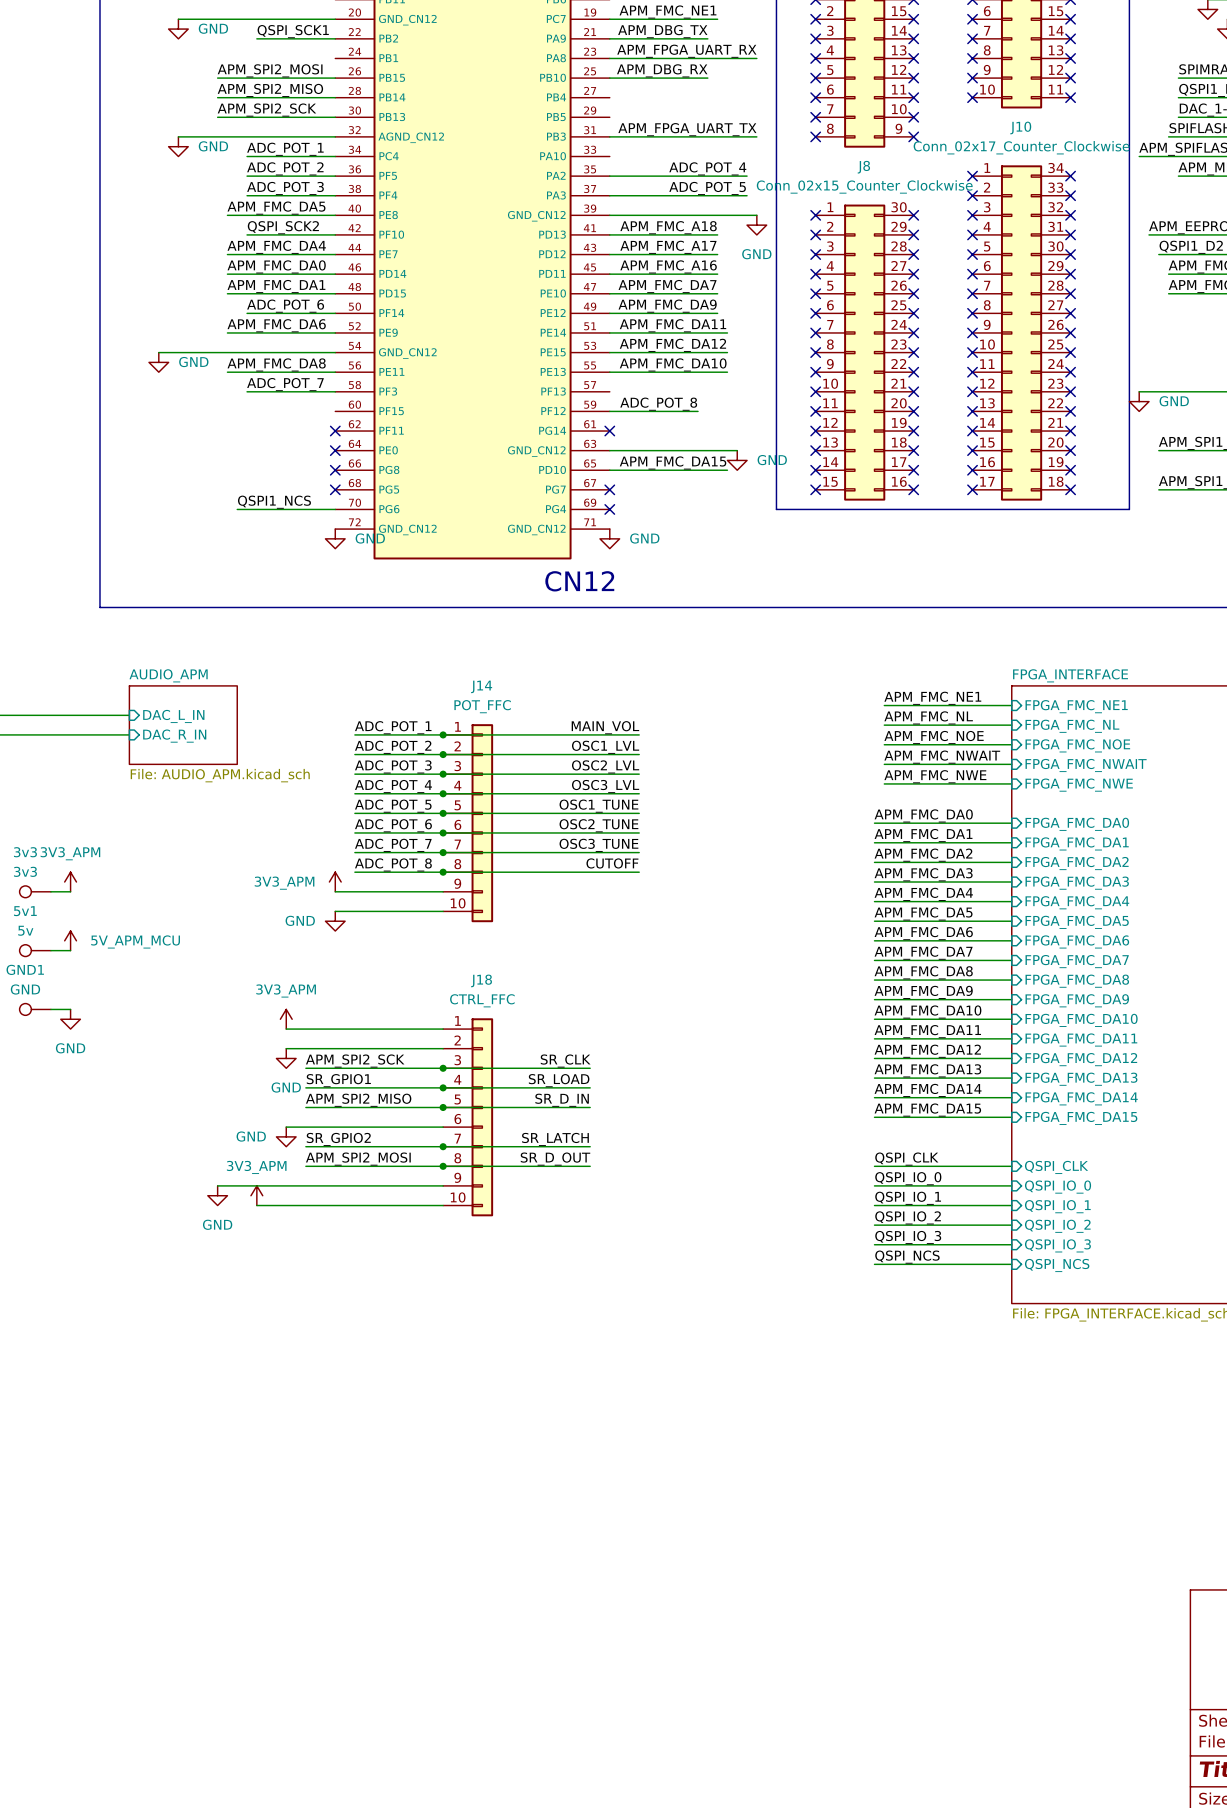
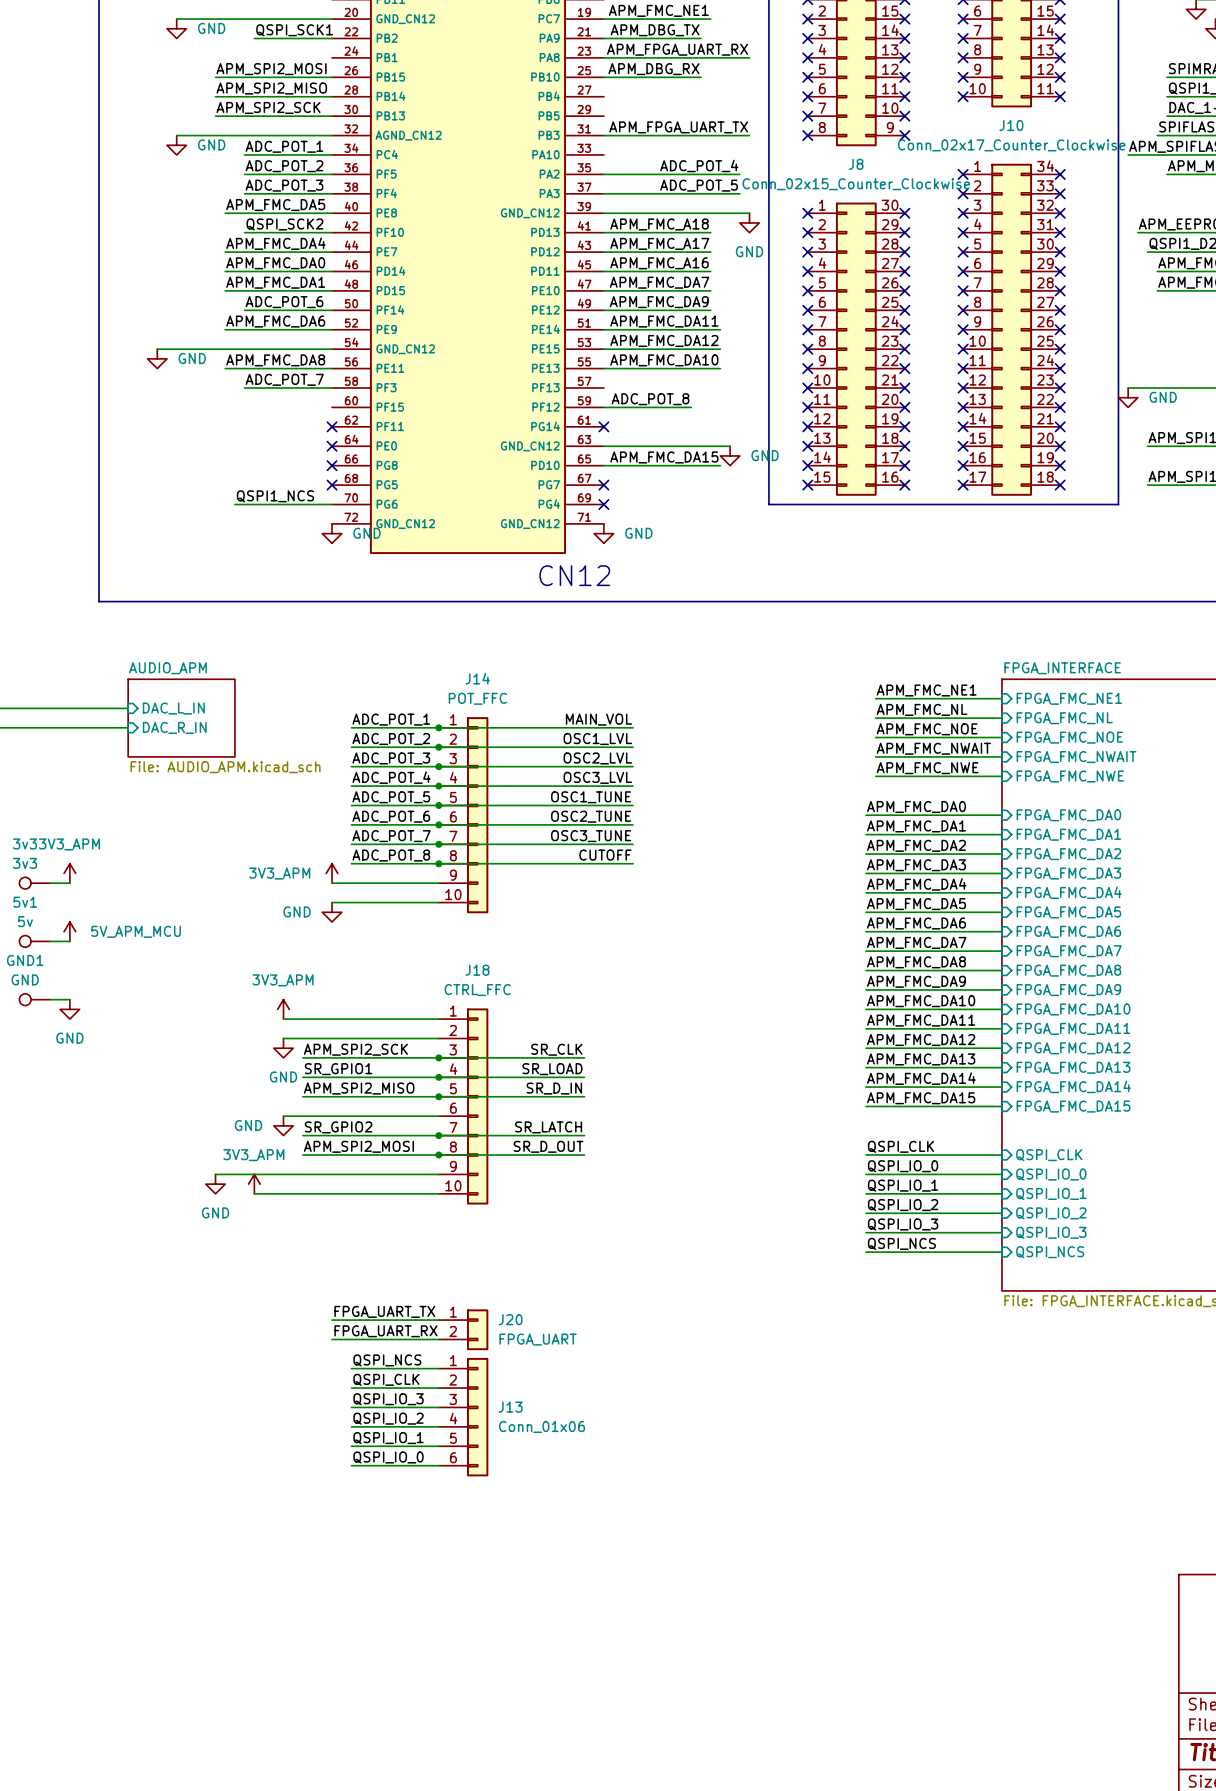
label: none -> FPGA_UART_TX (384, 1311)
wire: none -> (332, 1320) (438, 1320)
J20: none -> FPGA_UART (463, 1329)
label: none -> FPGA_UART_RX (385, 1331)
wire: none -> (332, 1339) (438, 1339)
label: none -> QSPI_NCS (387, 1360)
wire: none -> (351, 1368) (438, 1368)
label: none -> QSPI_CLK (386, 1379)
wire: none -> (351, 1388) (438, 1388)
label: none -> QSPI_IO_3 (388, 1399)
wire: none -> (351, 1407) (438, 1407)
J13: none -> Conn_01x06 (463, 1417)
label: none -> QSPI_IO_2 (388, 1418)
wire: none -> (351, 1426) (438, 1426)
label: none -> QSPI_IO_1 (388, 1438)
wire: none -> (351, 1446) (438, 1446)
label: none -> QSPI_IO_0 (388, 1457)
wire: none -> (351, 1465) (438, 1465)

